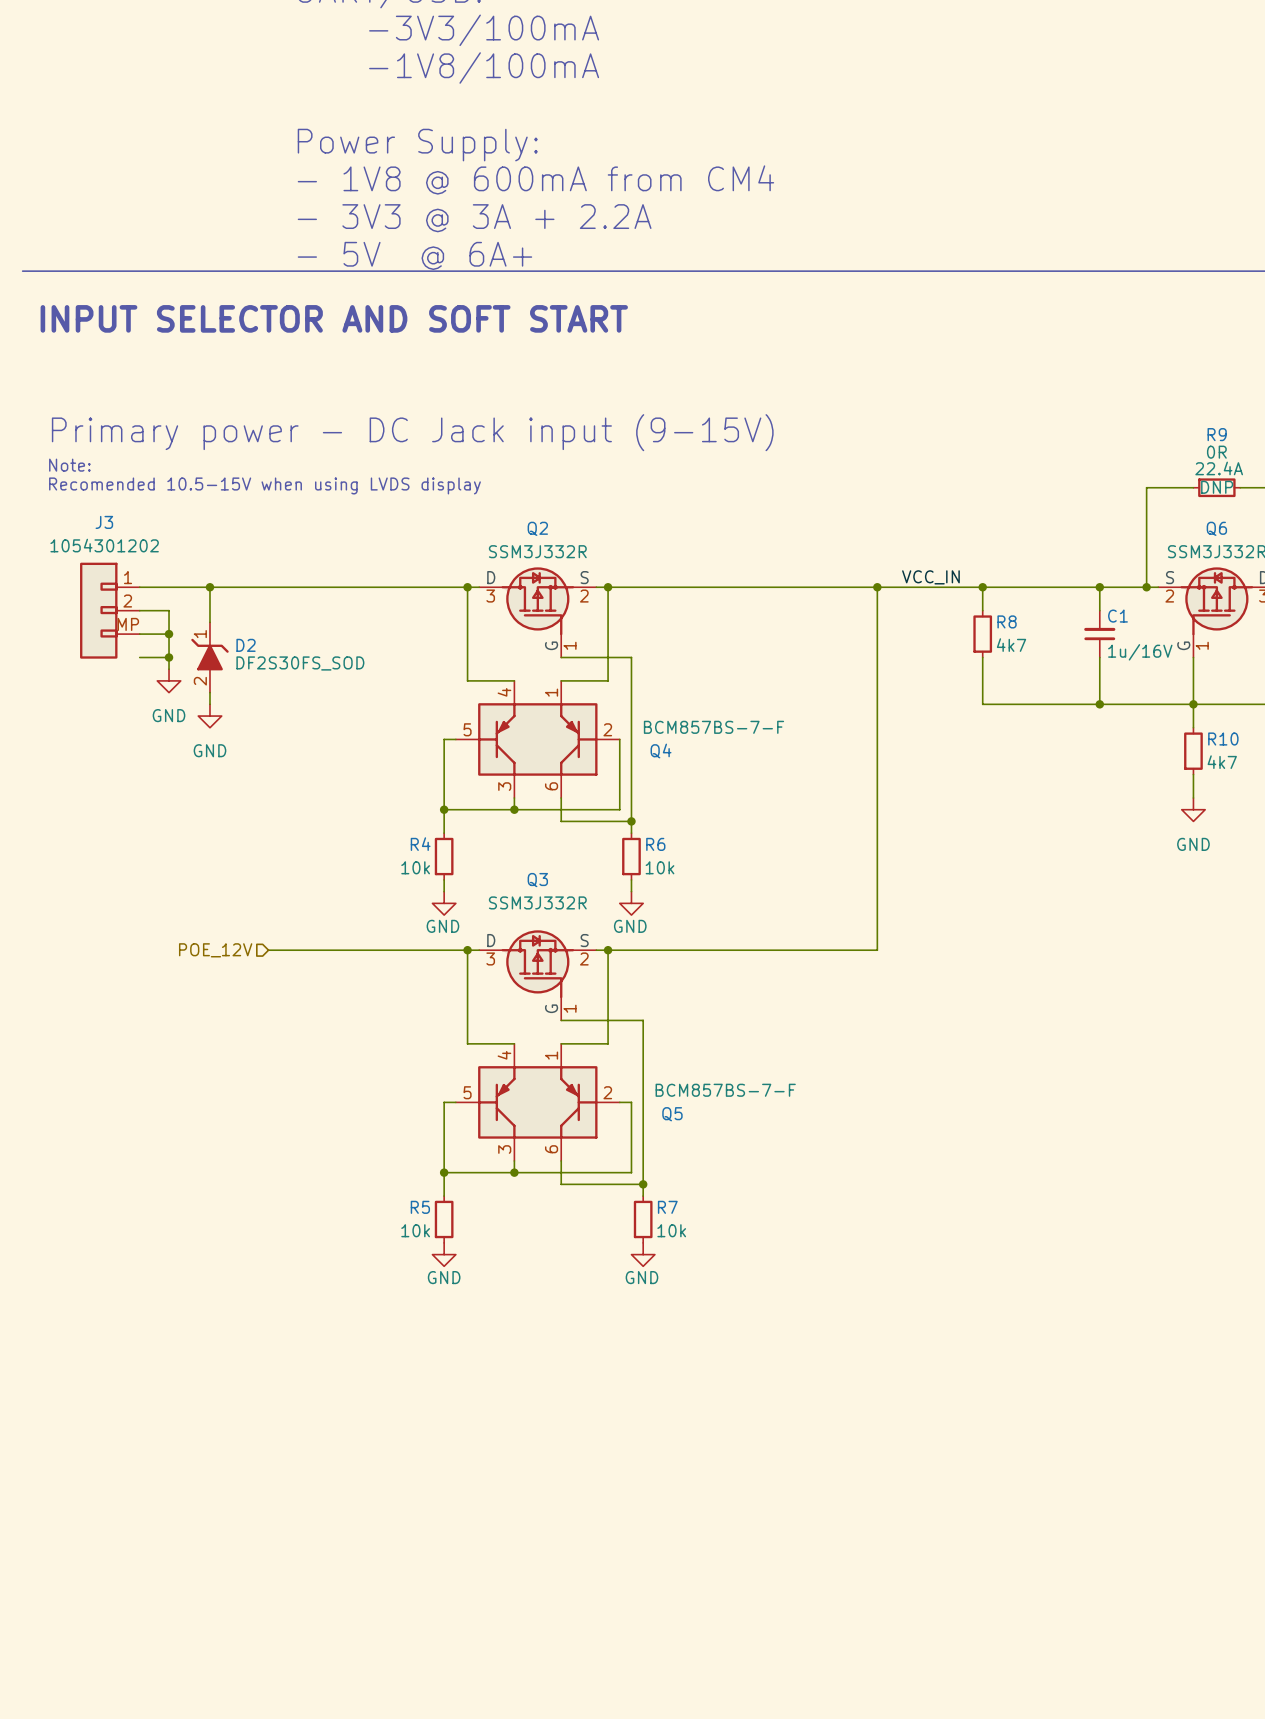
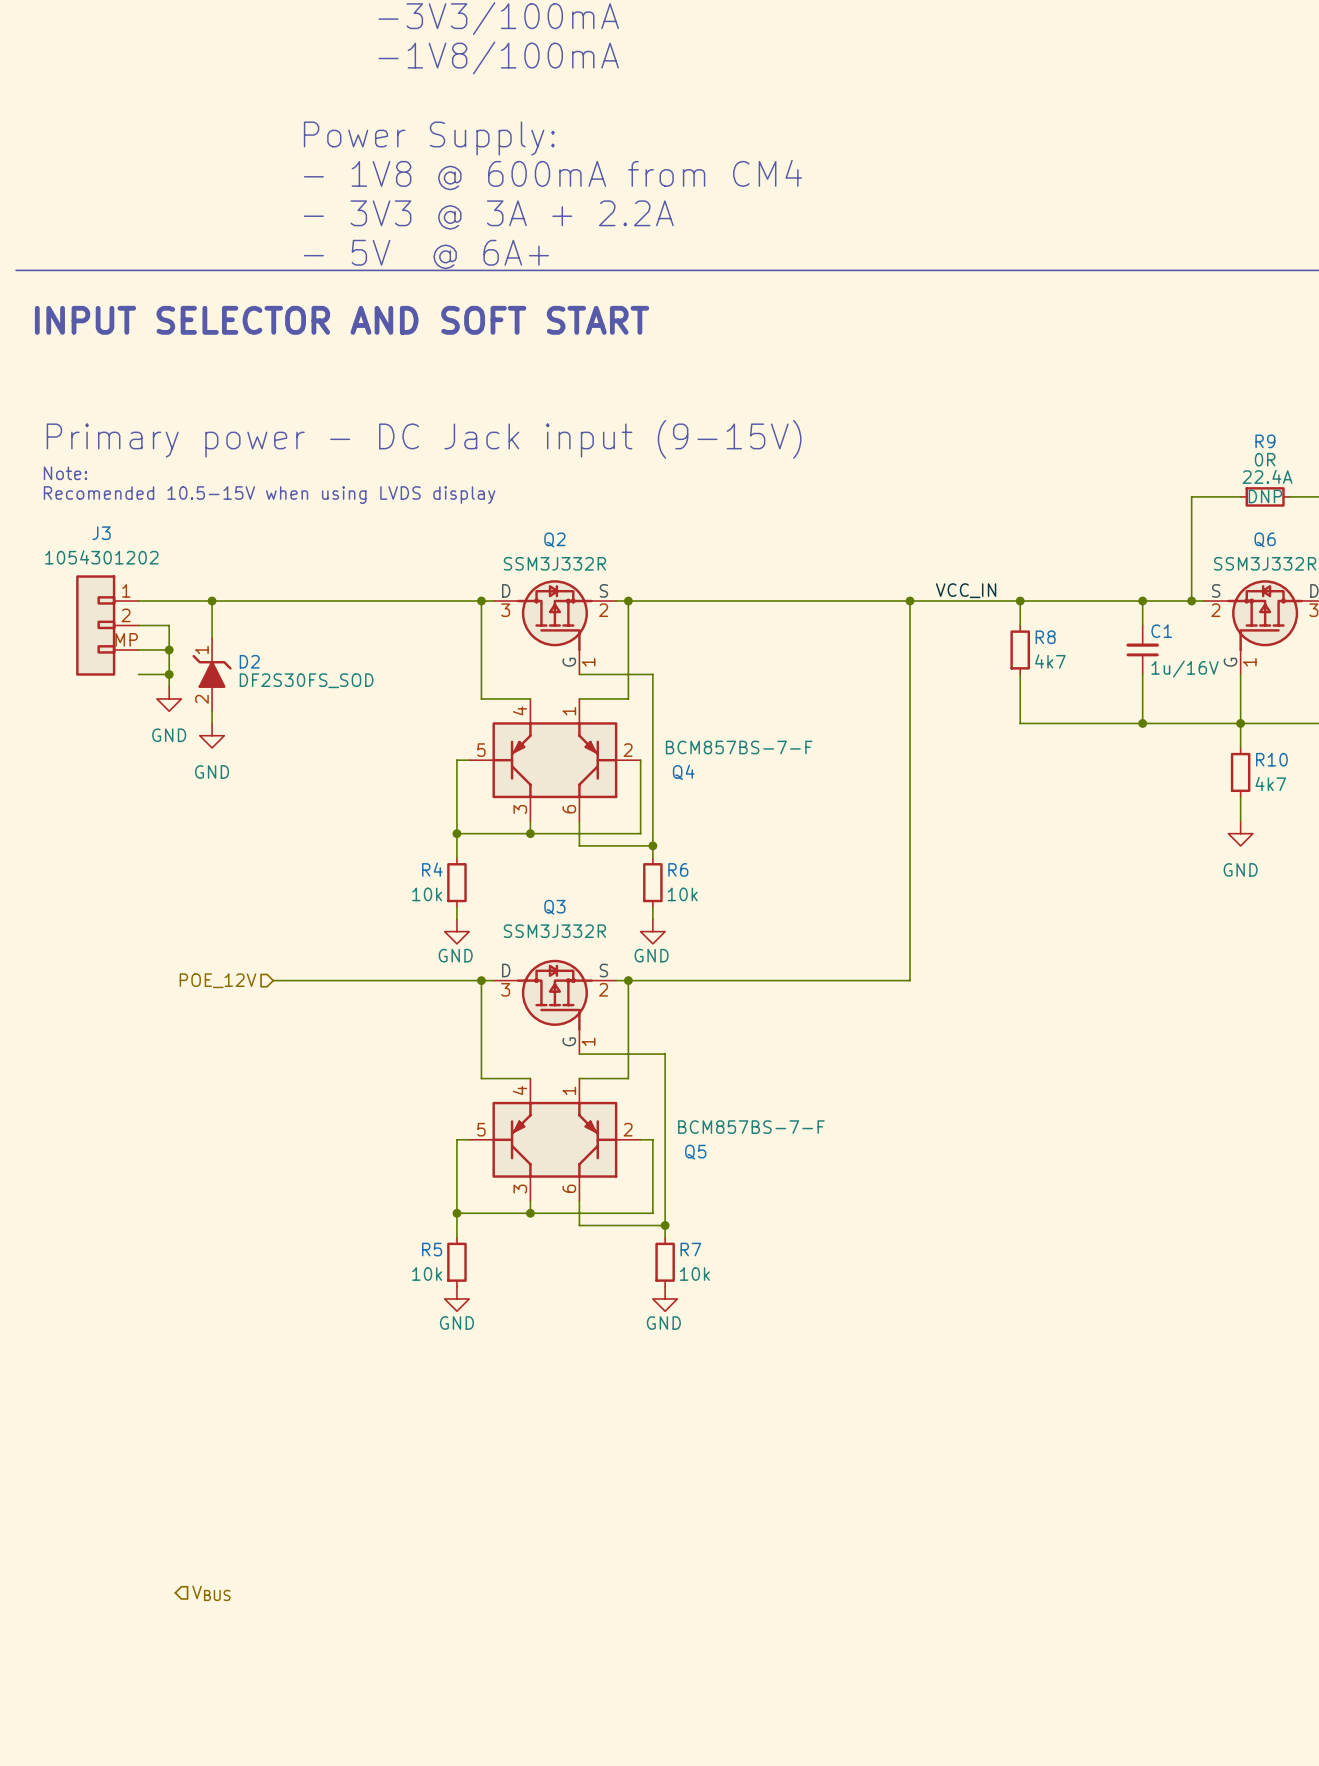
hierarchical label: none -> VBUS (211, 1593)

